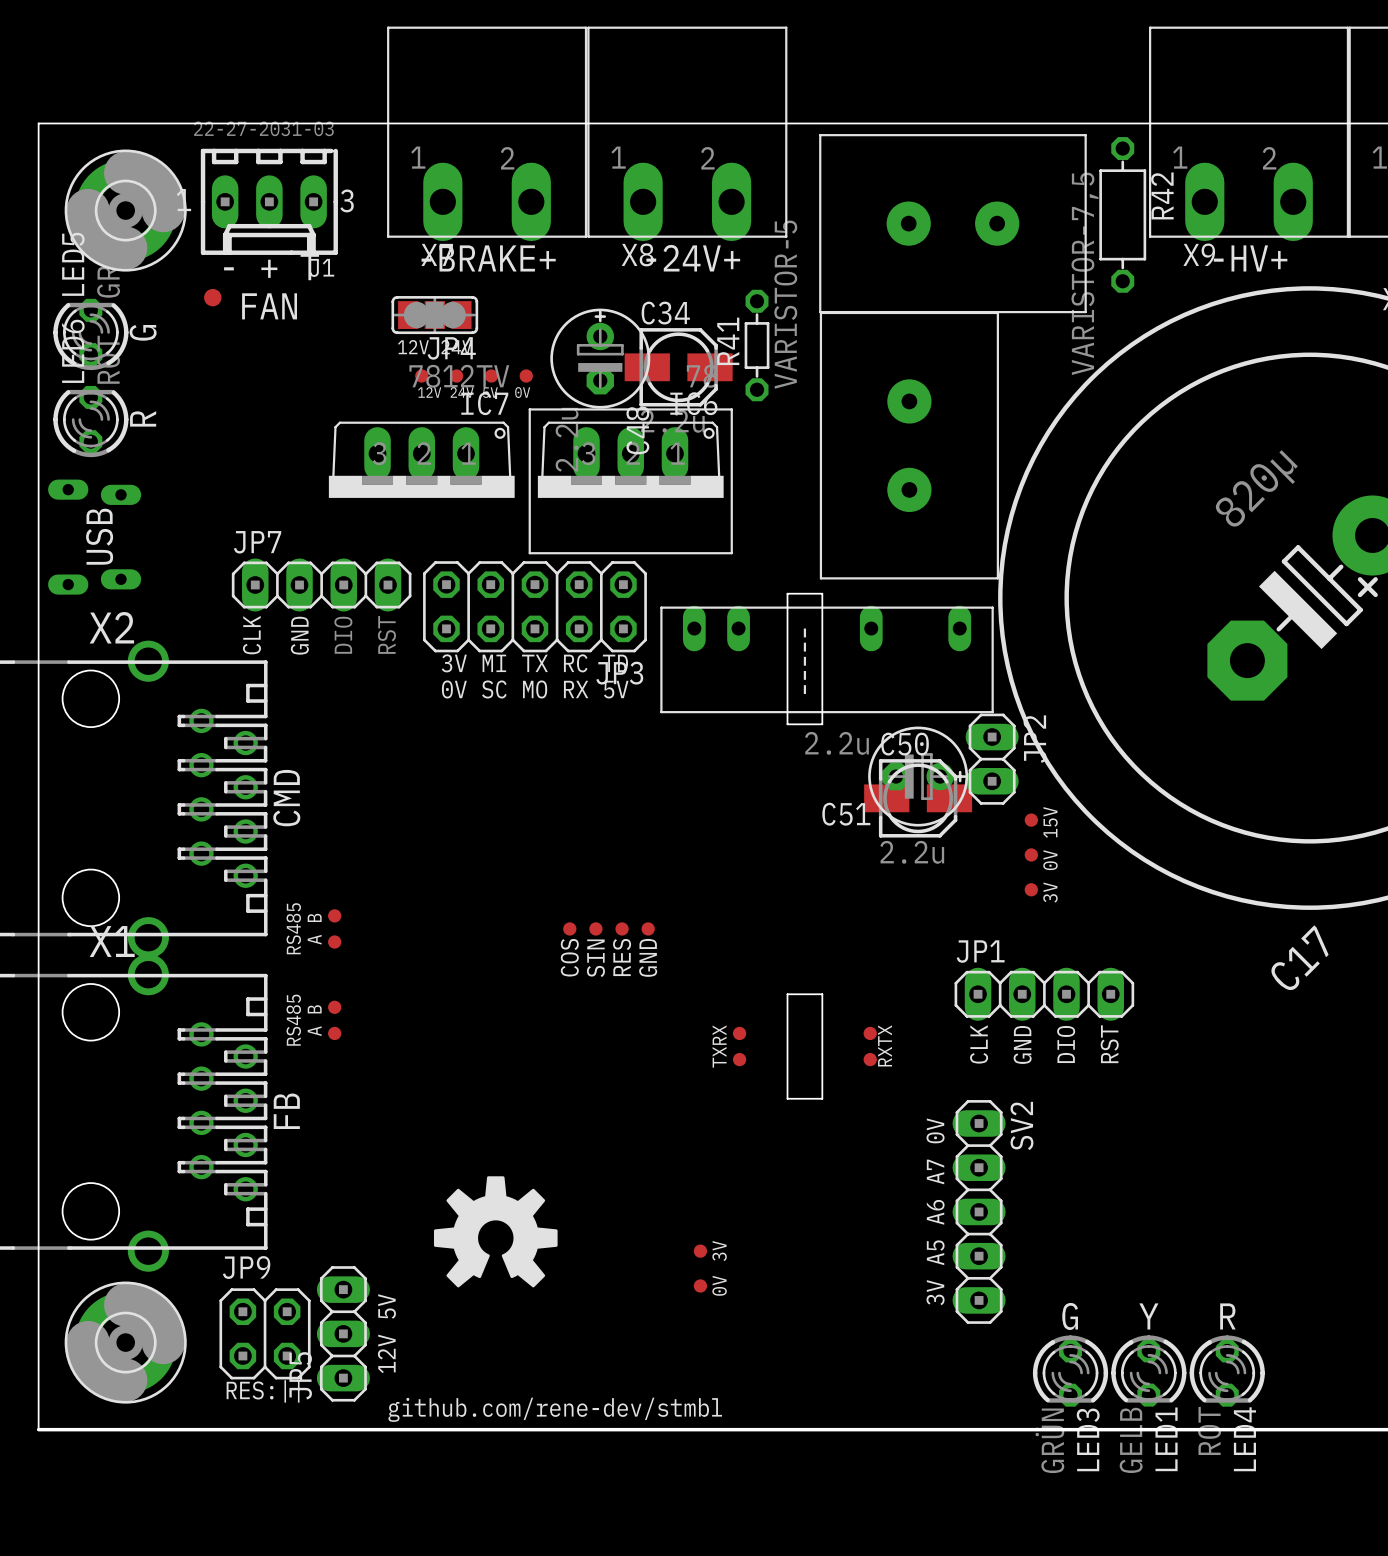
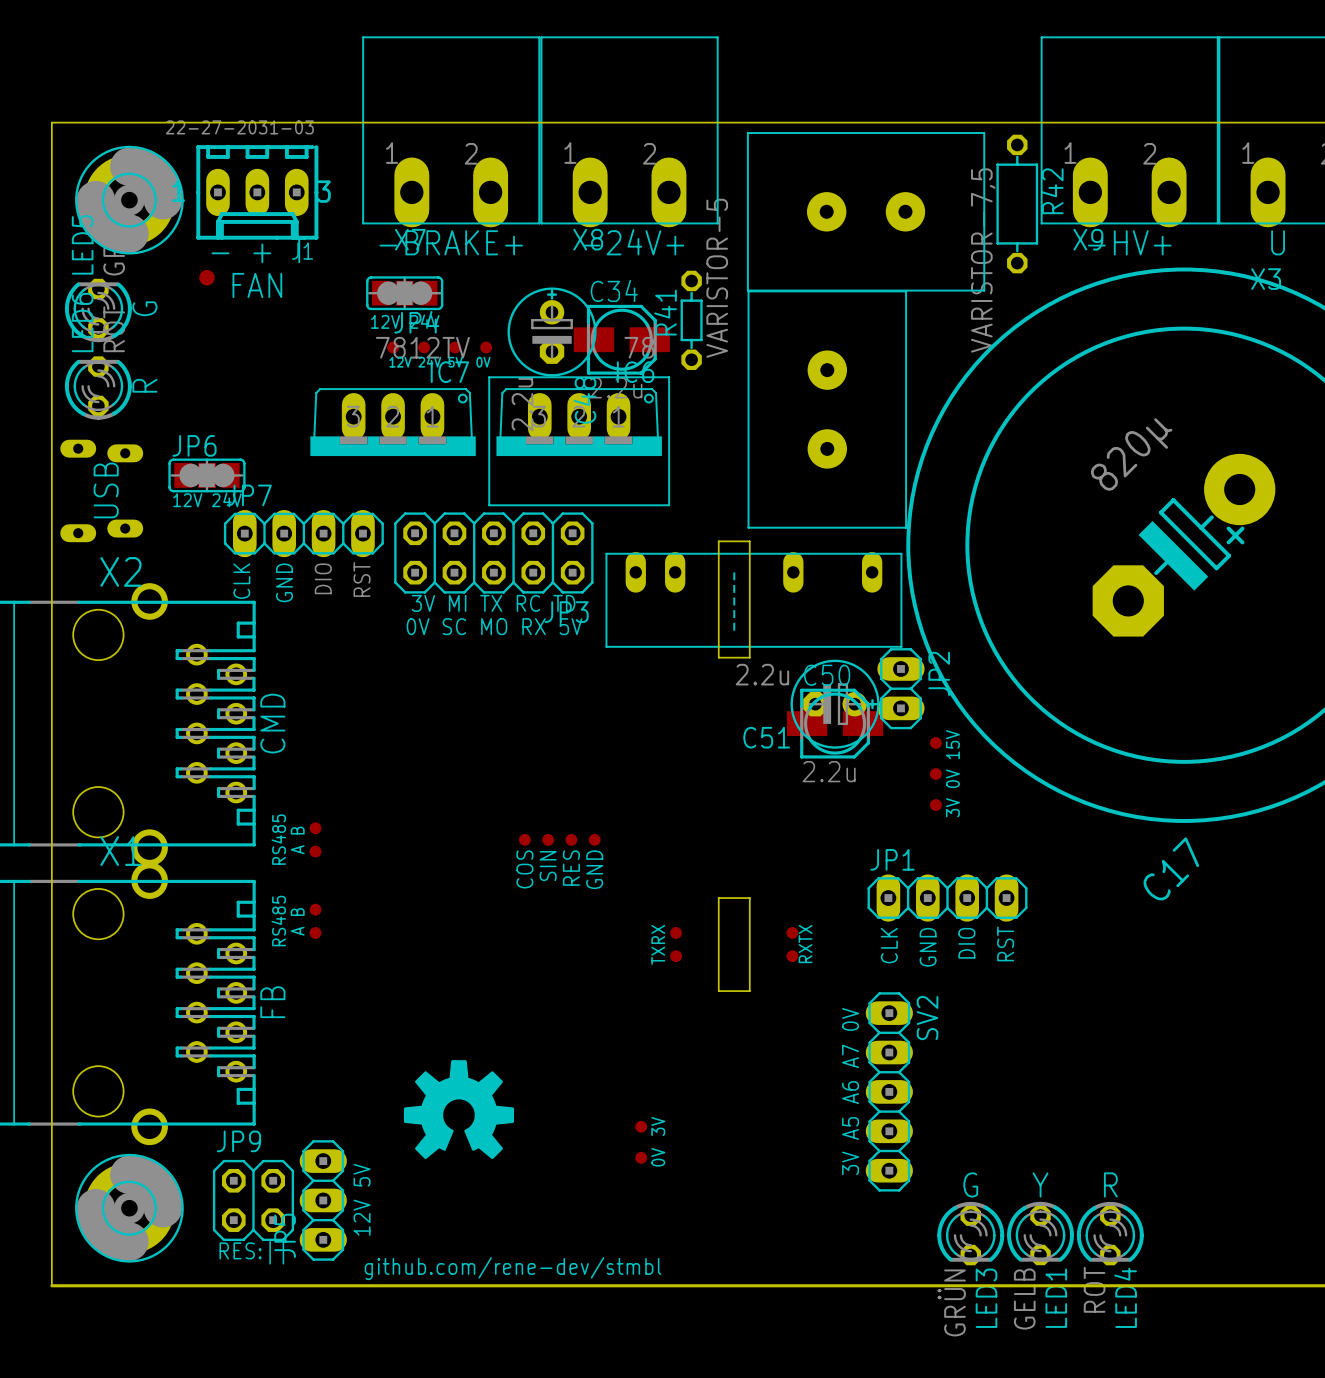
JP6: none -> (206, 475)
text: none -> 12V 24V (207, 499)

